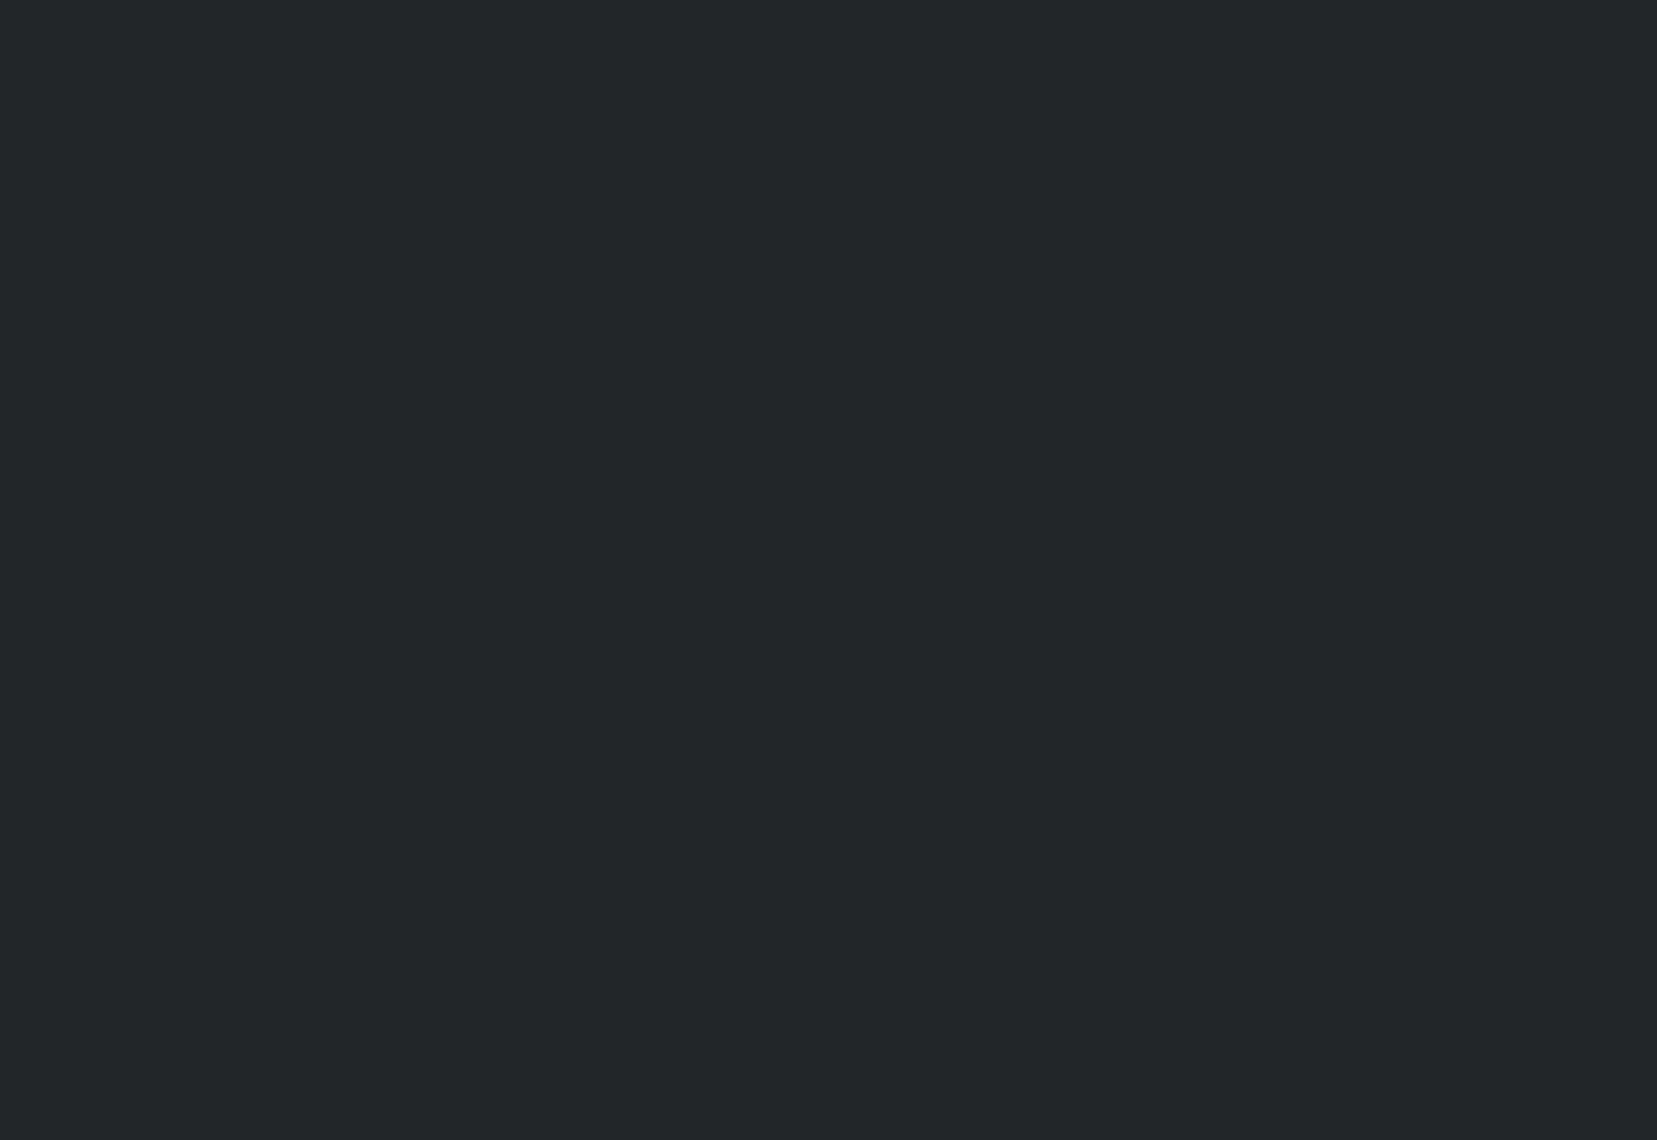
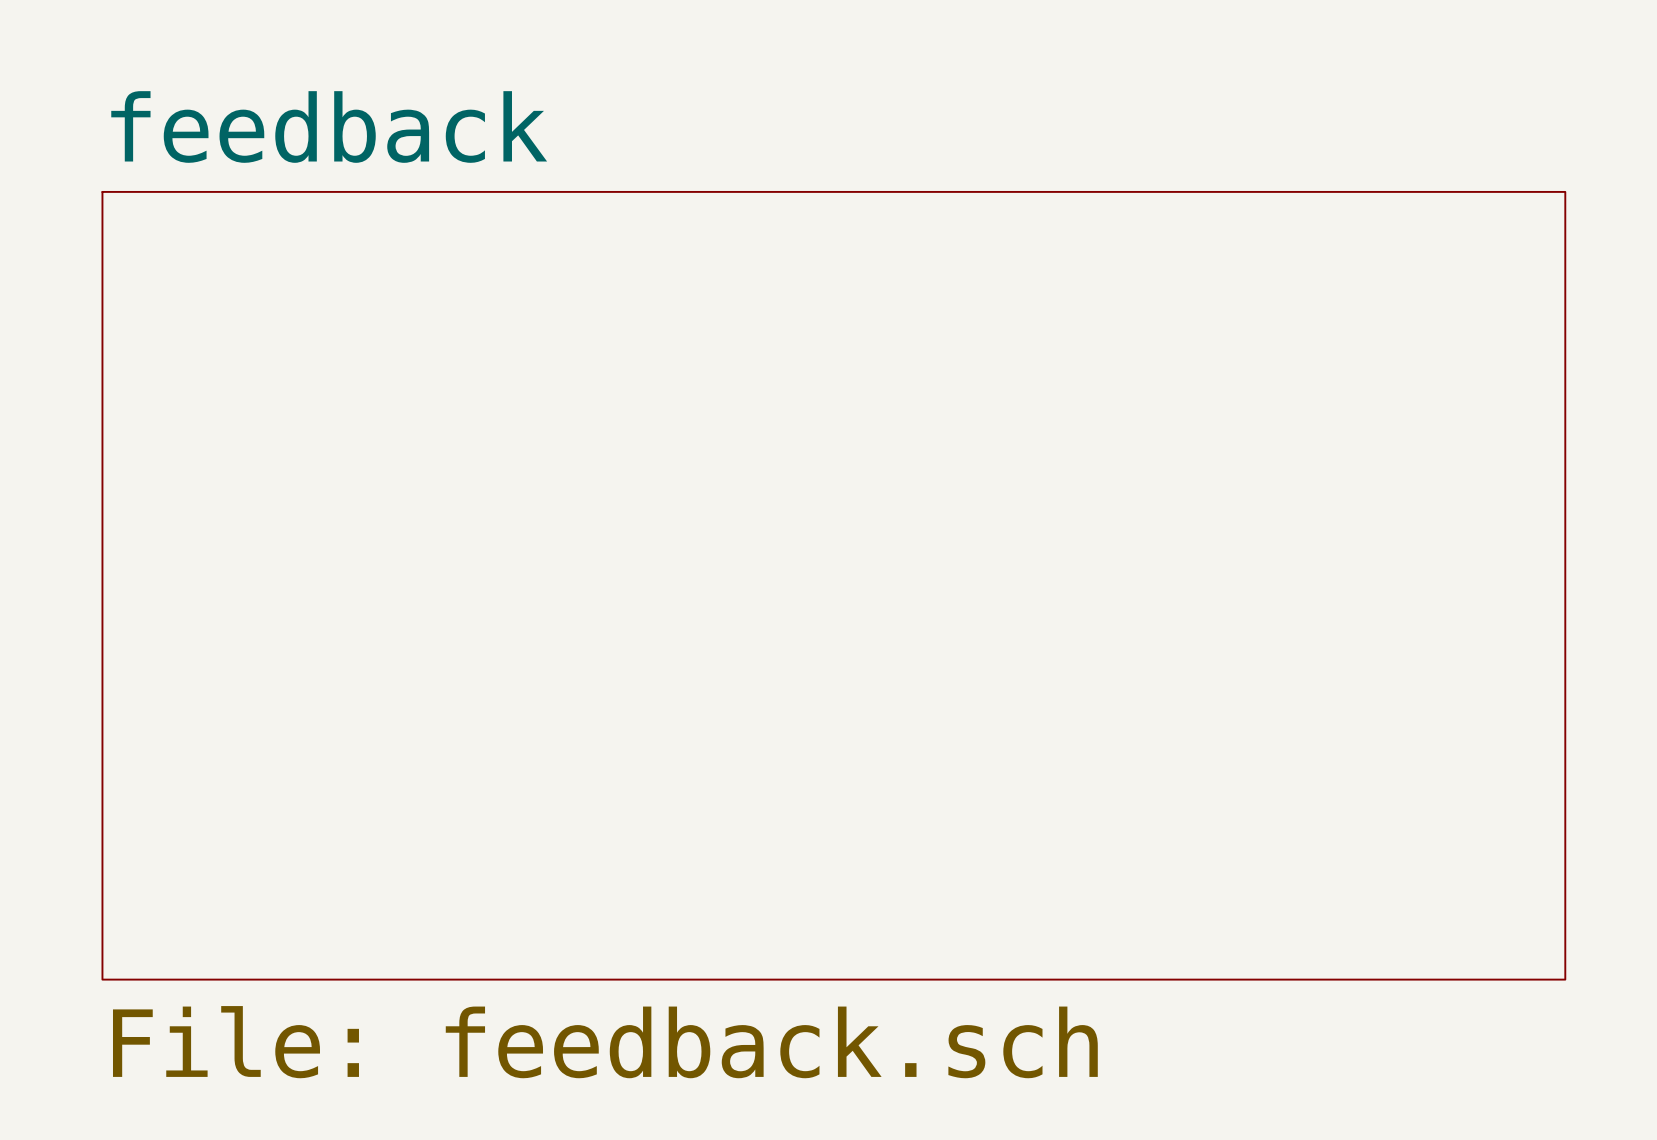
sheet feedback: none -> File: feedback.sch (833, 585)

